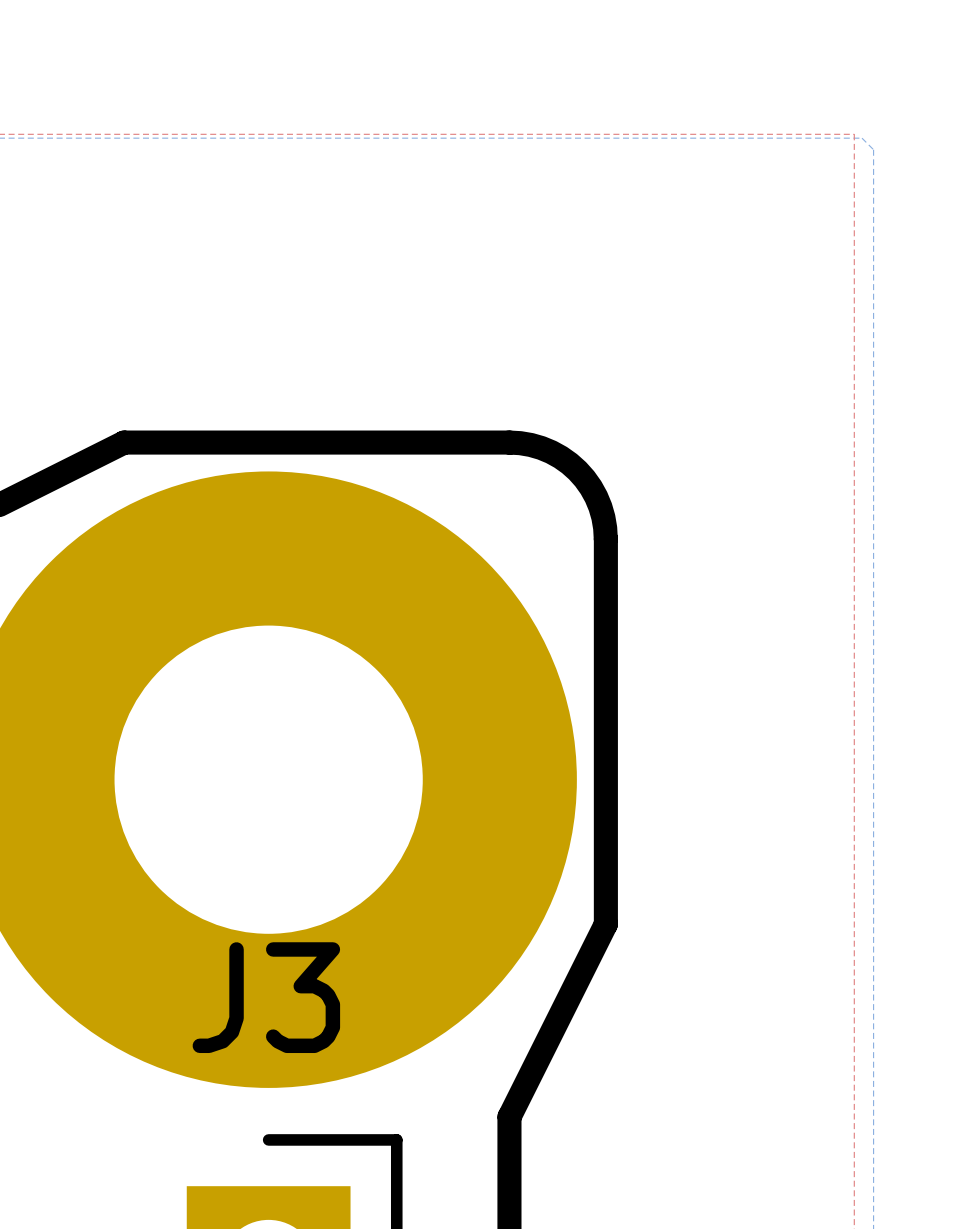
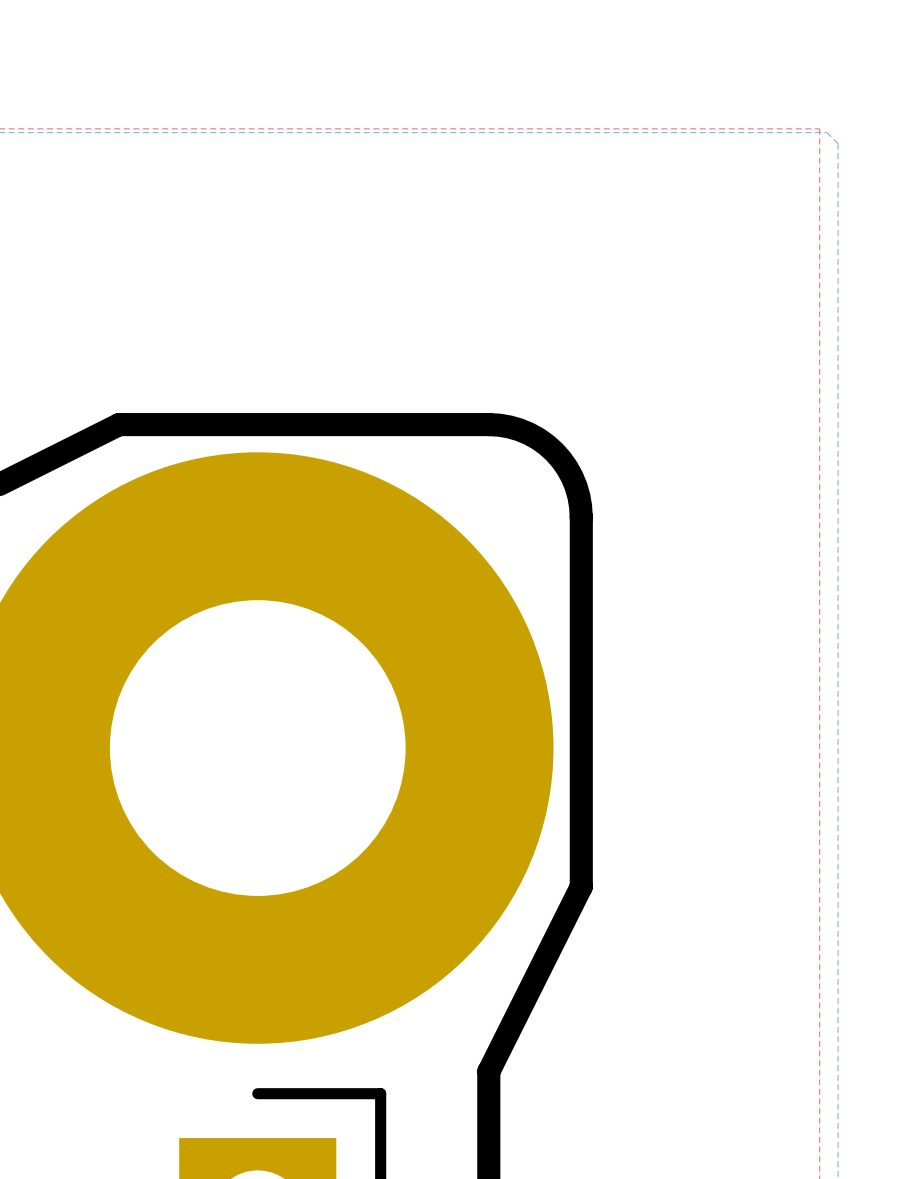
J3 name: J3 (266, 997) -> none

